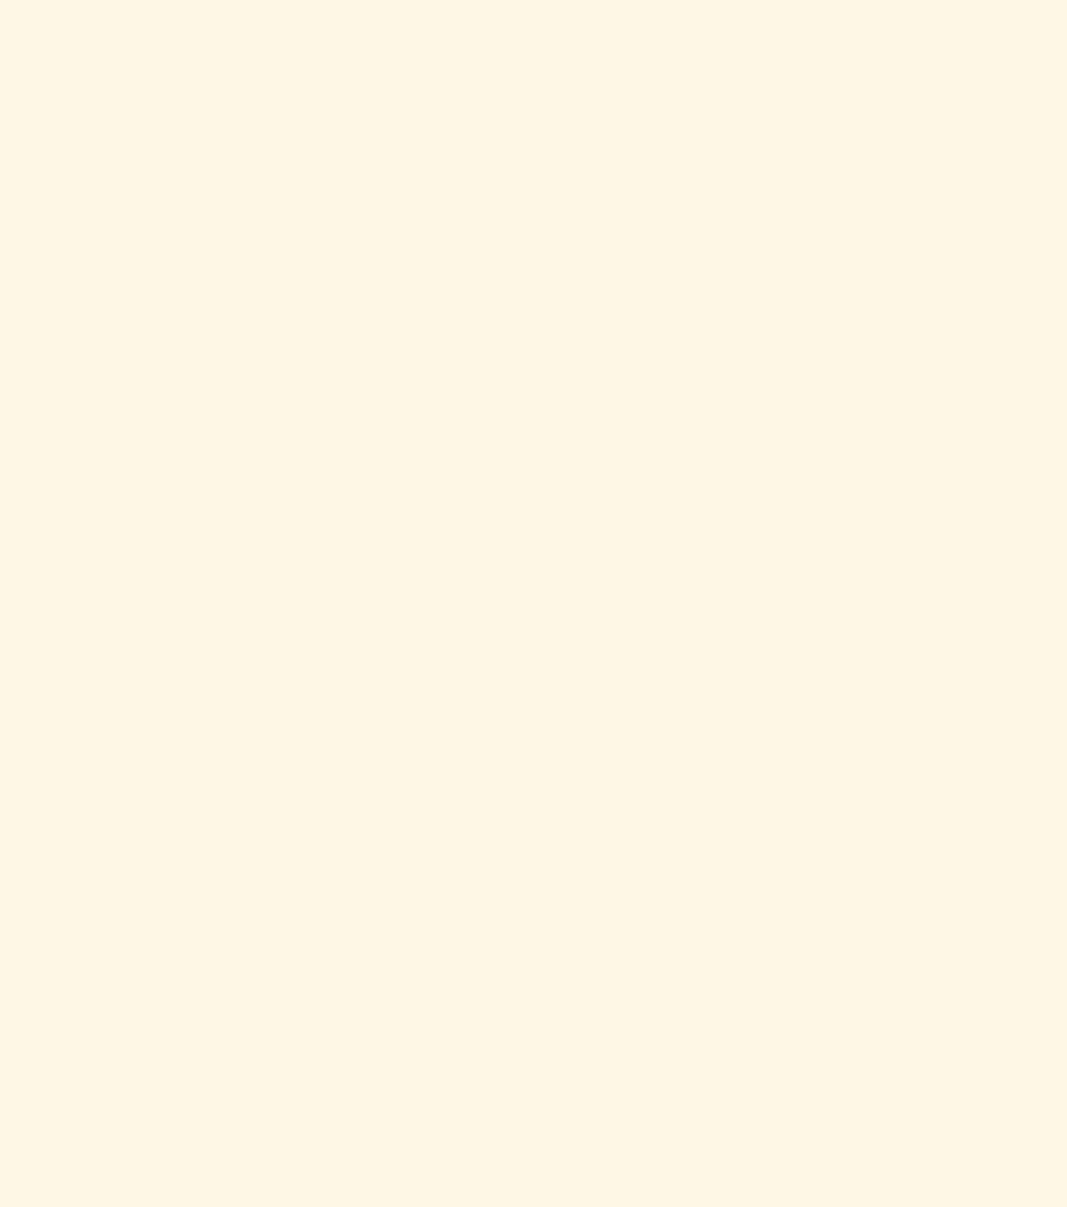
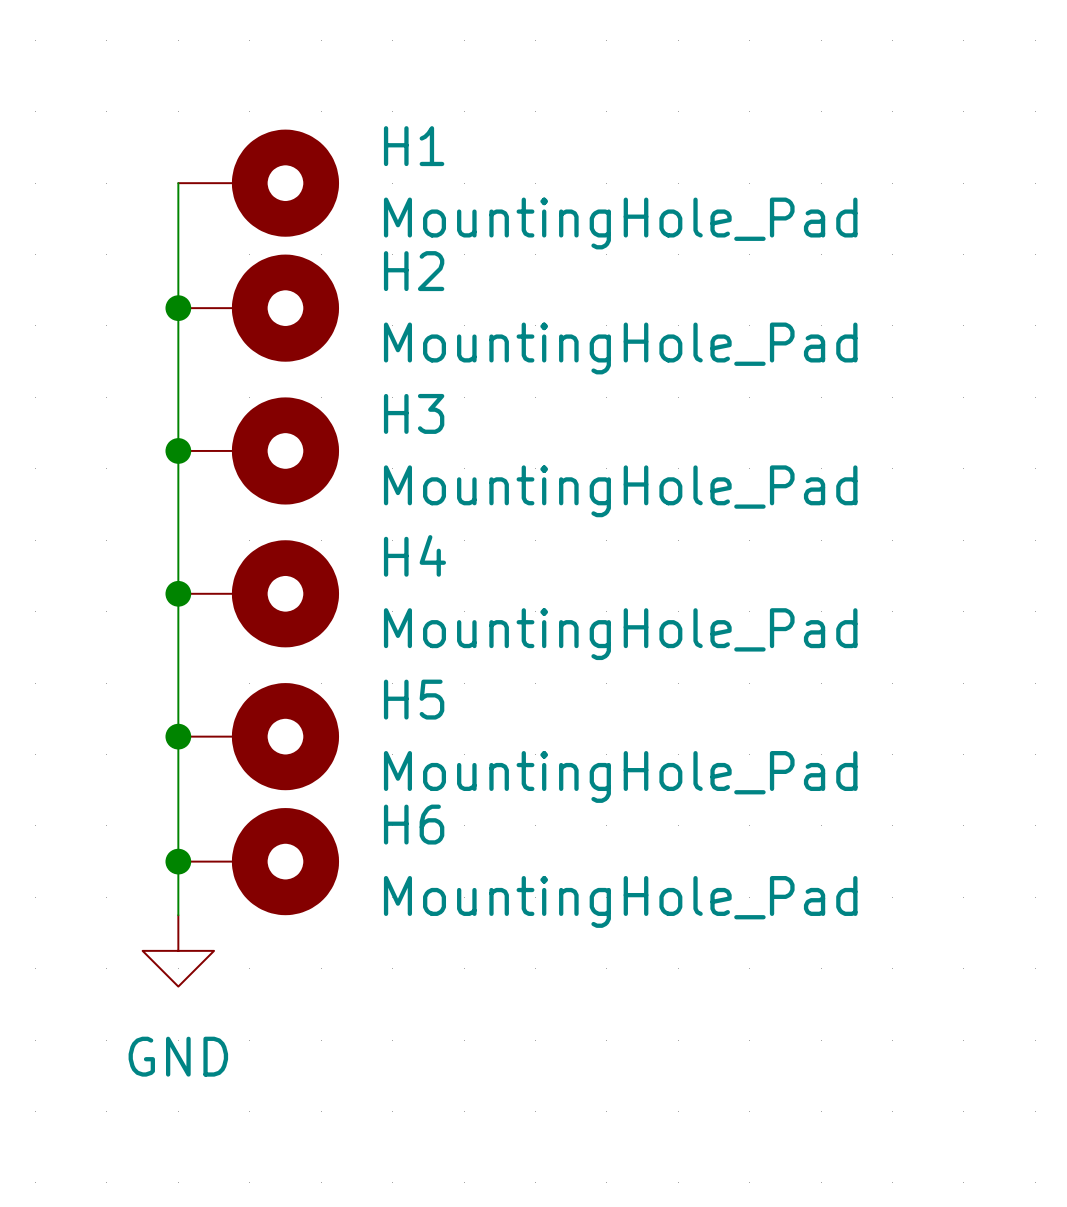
wire: none -> (178, 183) (178, 915)
H1: none -> MountingHole_Pad (258, 183)
junction: none -> (178, 308)
H2: none -> MountingHole_Pad (258, 308)
junction: none -> (178, 450)
H3: none -> MountingHole_Pad (258, 450)
junction: none -> (178, 593)
H4: none -> MountingHole_Pad (258, 593)
junction: none -> (178, 736)
H5: none -> MountingHole_Pad (258, 736)
junction: none -> (178, 861)
H6: none -> MountingHole_Pad (258, 861)
power symbol: none -> GND (178, 950)

